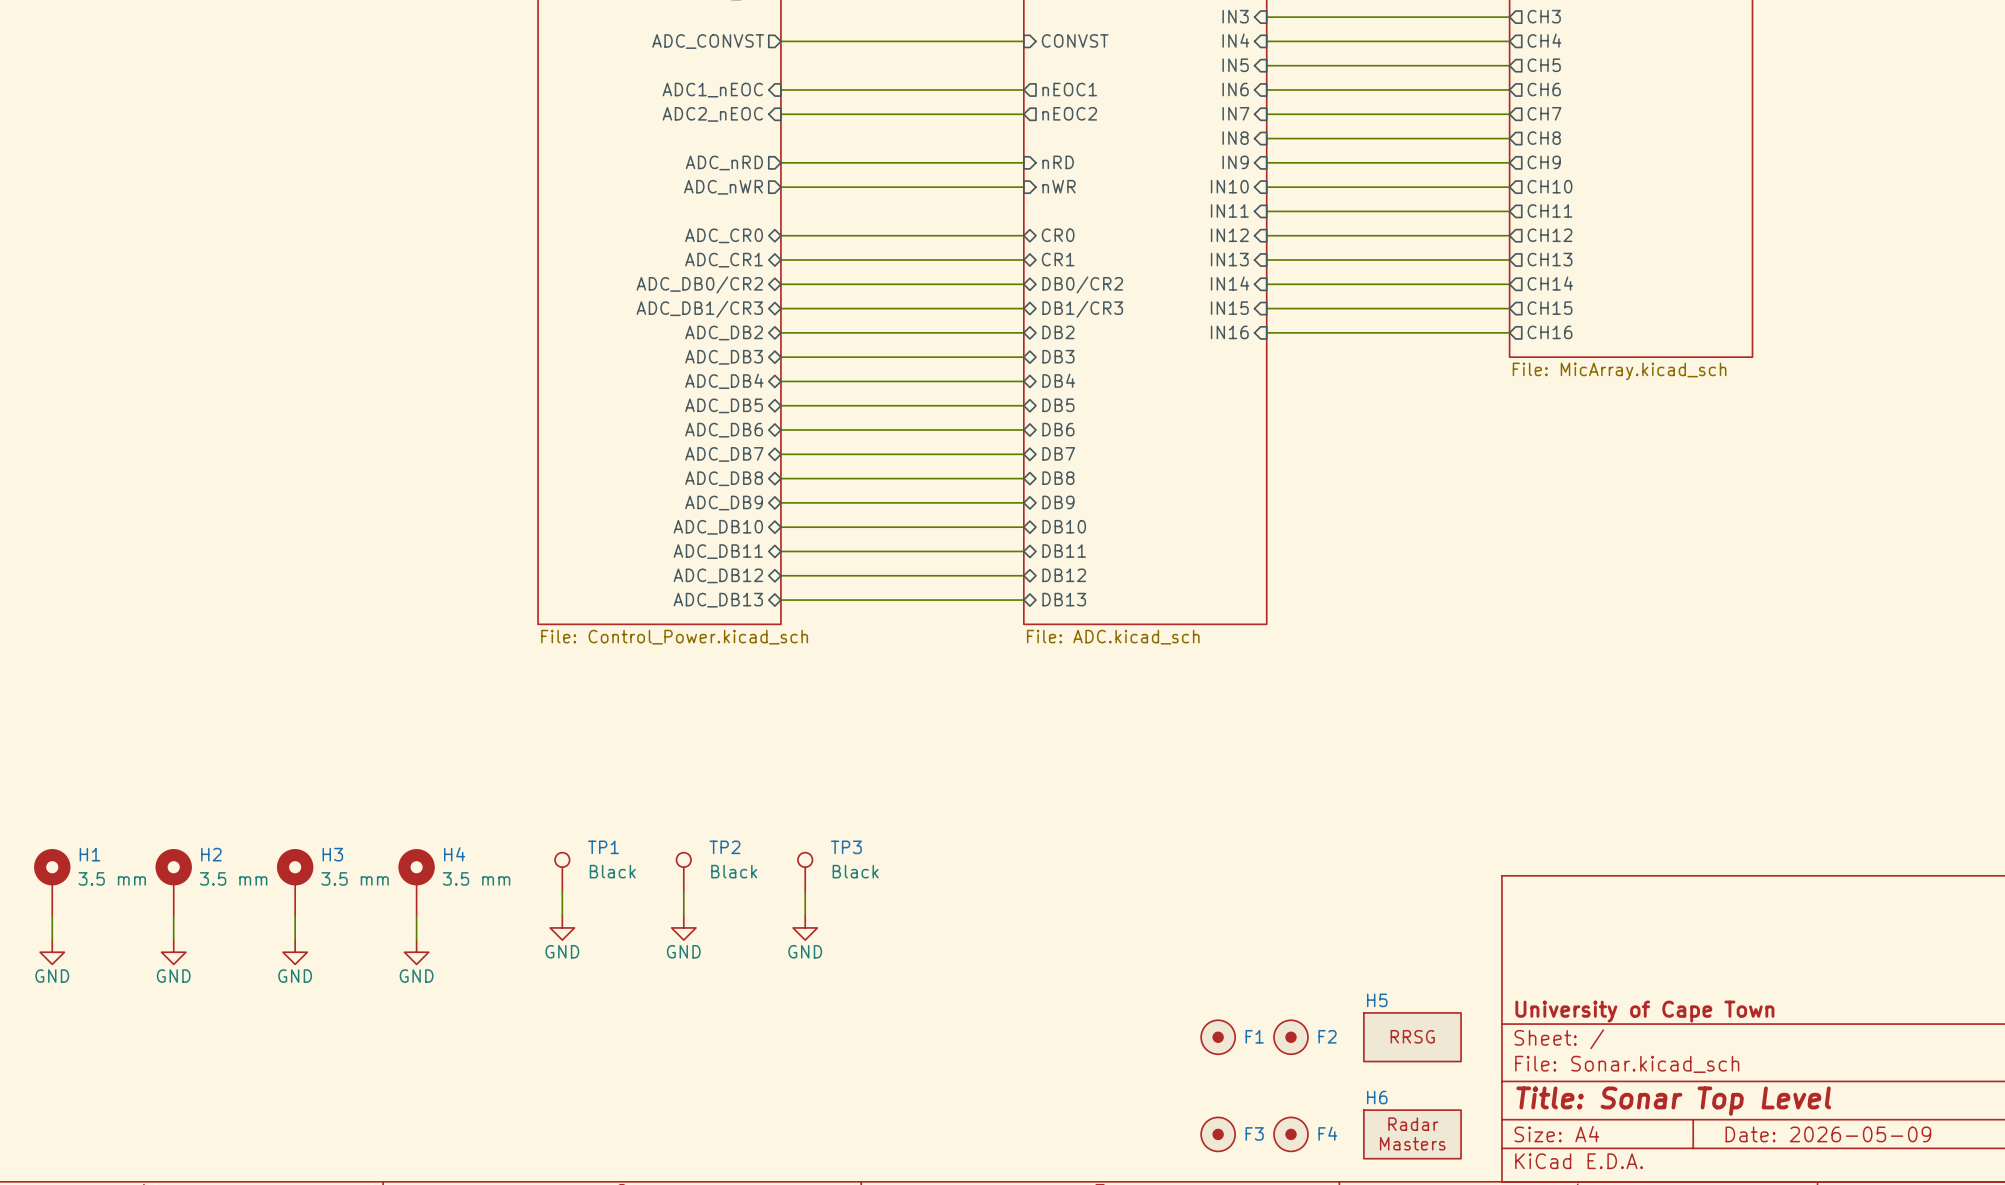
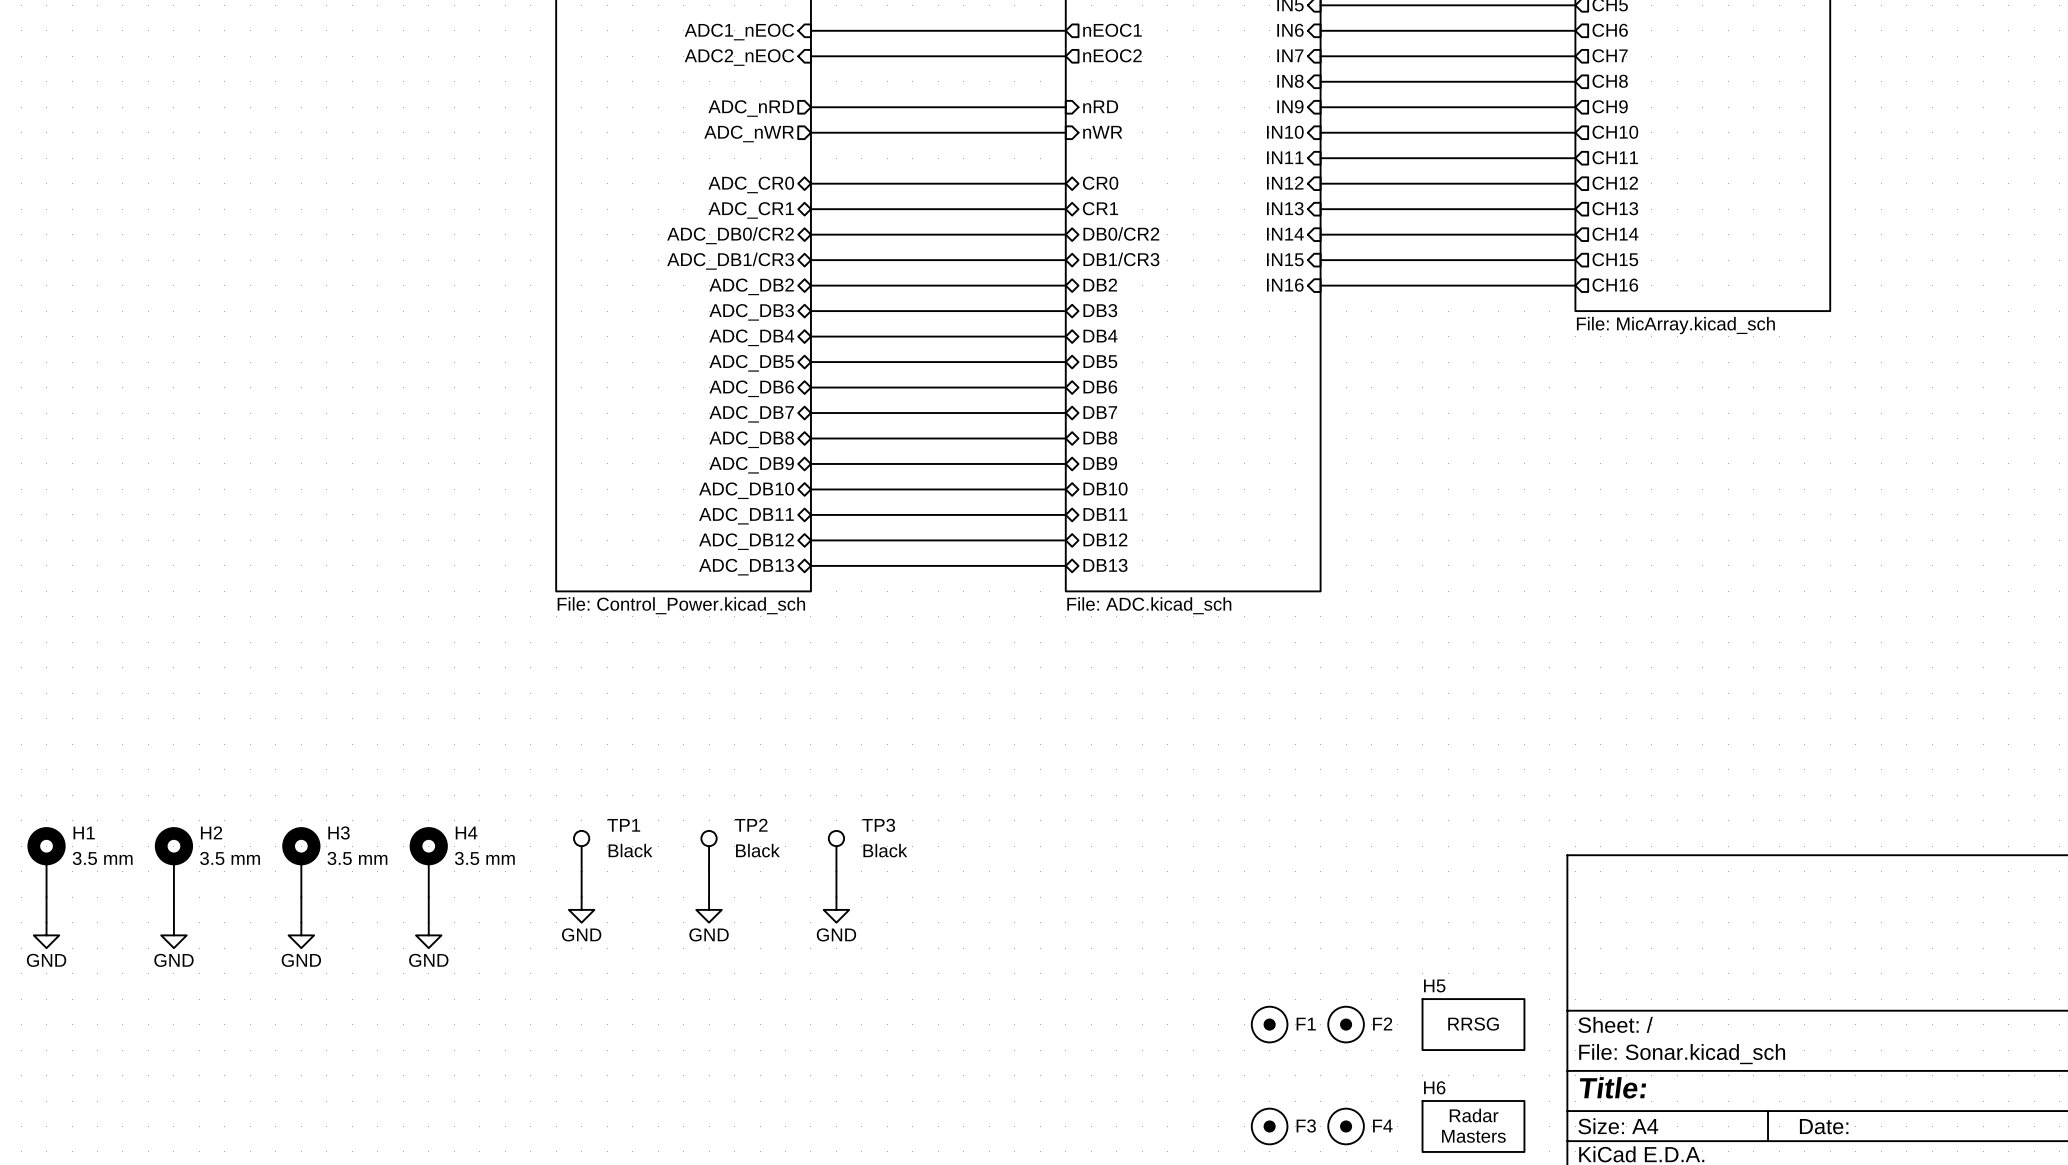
title block: University of Cape Town (1644, 1011) -> none
title block: Title: Sonar Top Level (1673, 1101) -> Title: (1612, 1087)
title block: Date: 2026-05-09 (1828, 1134) -> Date: (1824, 1126)

